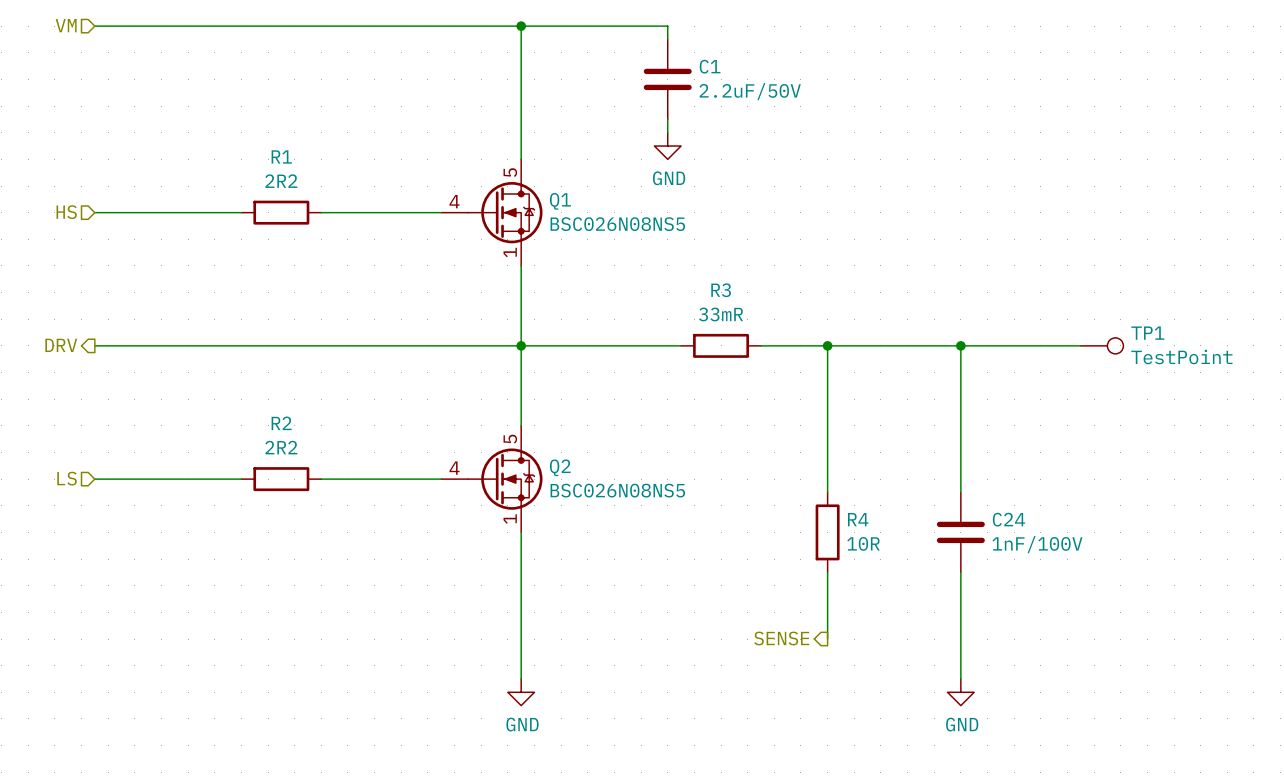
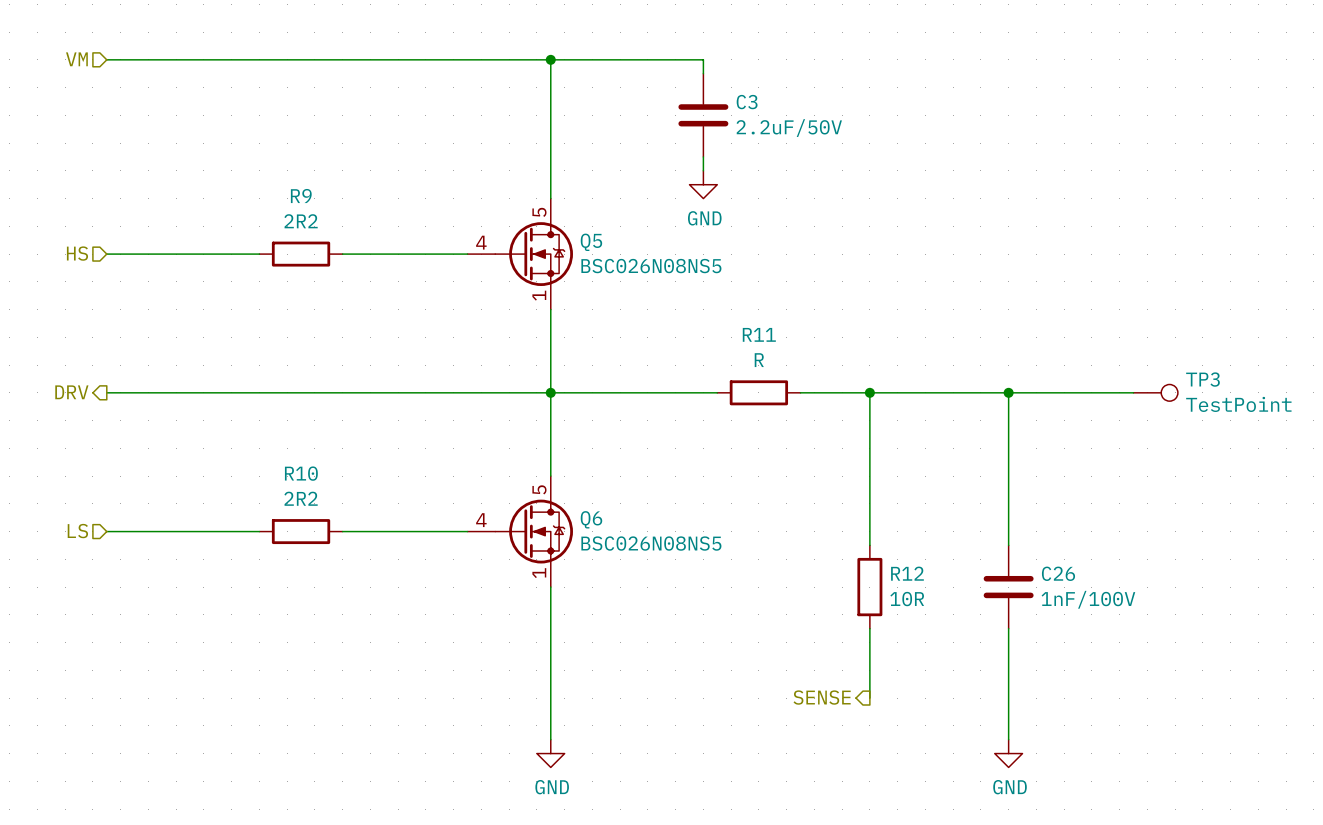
C1 name: C1 (710, 66) -> C3 (747, 102)
R1 name: R1 (281, 156) -> R9 (301, 196)
Q1 name: Q1 (560, 201) -> Q5 (591, 242)
R3 name: R3 (721, 290) -> R11 (759, 334)
R3 value: 33mR (721, 314) -> R (759, 360)
TP1 name: TP1 (1147, 333) -> TP3 (1202, 379)
R2 name: R2 (281, 423) -> R10 (301, 473)
Q2 name: Q2 (560, 467) -> Q6 (591, 519)
R4 name: R4 (858, 519) -> R12 (907, 573)
C24 name: C24 (1008, 519) -> C26 (1058, 573)

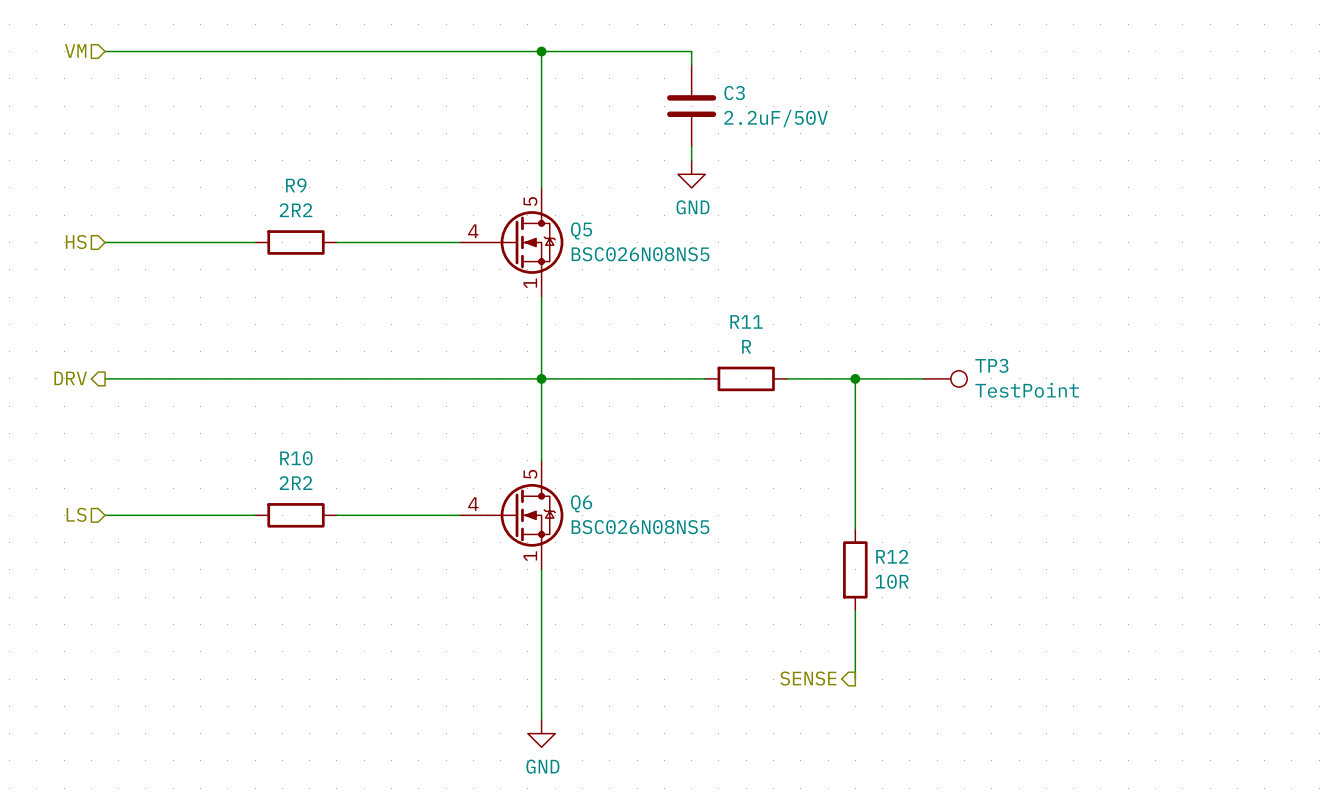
wire: (939, 392) (1133, 392) -> none
wire: (1008, 392) (1008, 545) -> none
junction: (1008, 392) -> none
TP3 position: (1155, 392) -> (945, 378)
C26: 1nF/100V (1008, 587) -> none
wire: (1008, 628) (1008, 739) -> none
power symbol: GND (1008, 753) -> none

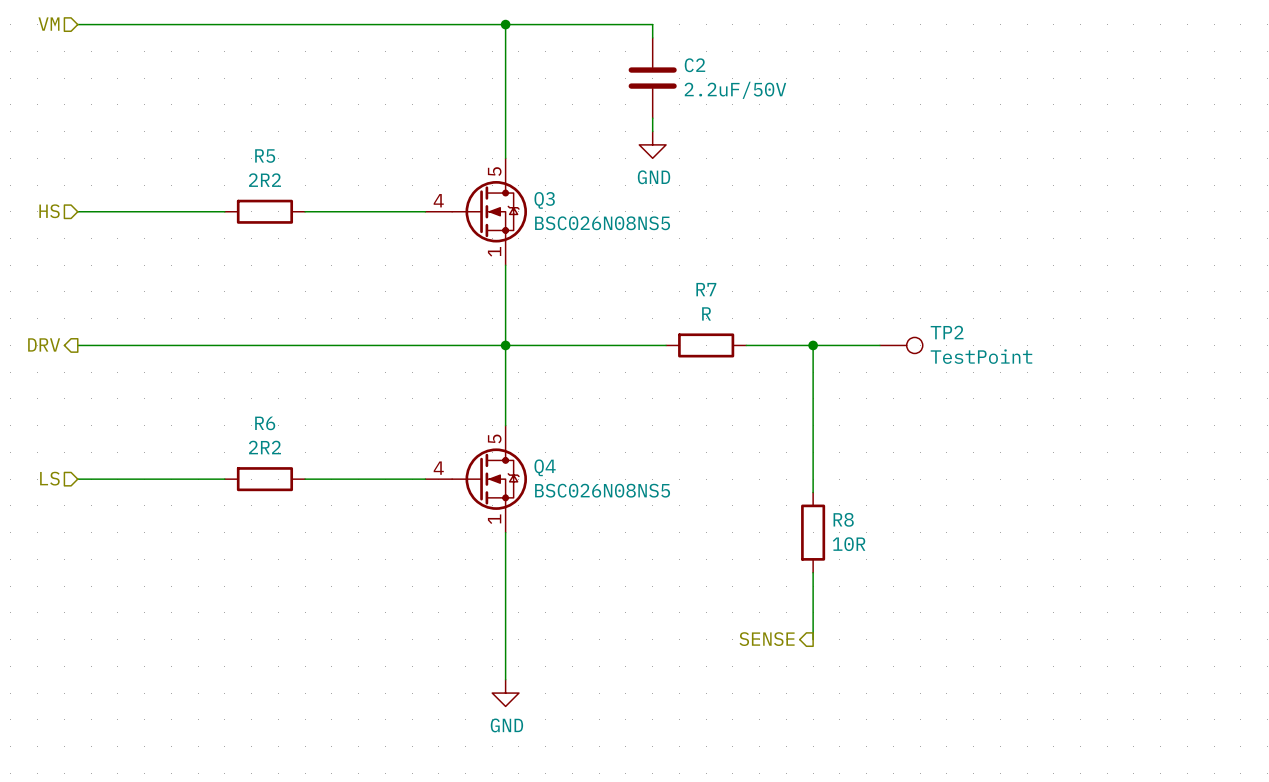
C3 name: C3 (734, 93) -> C2 (694, 65)
R9 name: R9 (296, 185) -> R5 (265, 156)
Q5 name: Q5 (581, 230) -> Q3 (544, 200)
R11 name: R11 (746, 321) -> R7 (706, 289)
TP3 name: TP3 (991, 365) -> TP2 (947, 332)
R10 name: R10 (296, 458) -> R6 (265, 423)
Q6 name: Q6 (581, 503) -> Q4 (545, 467)
R12 name: R12 (892, 556) -> R8 (843, 519)

